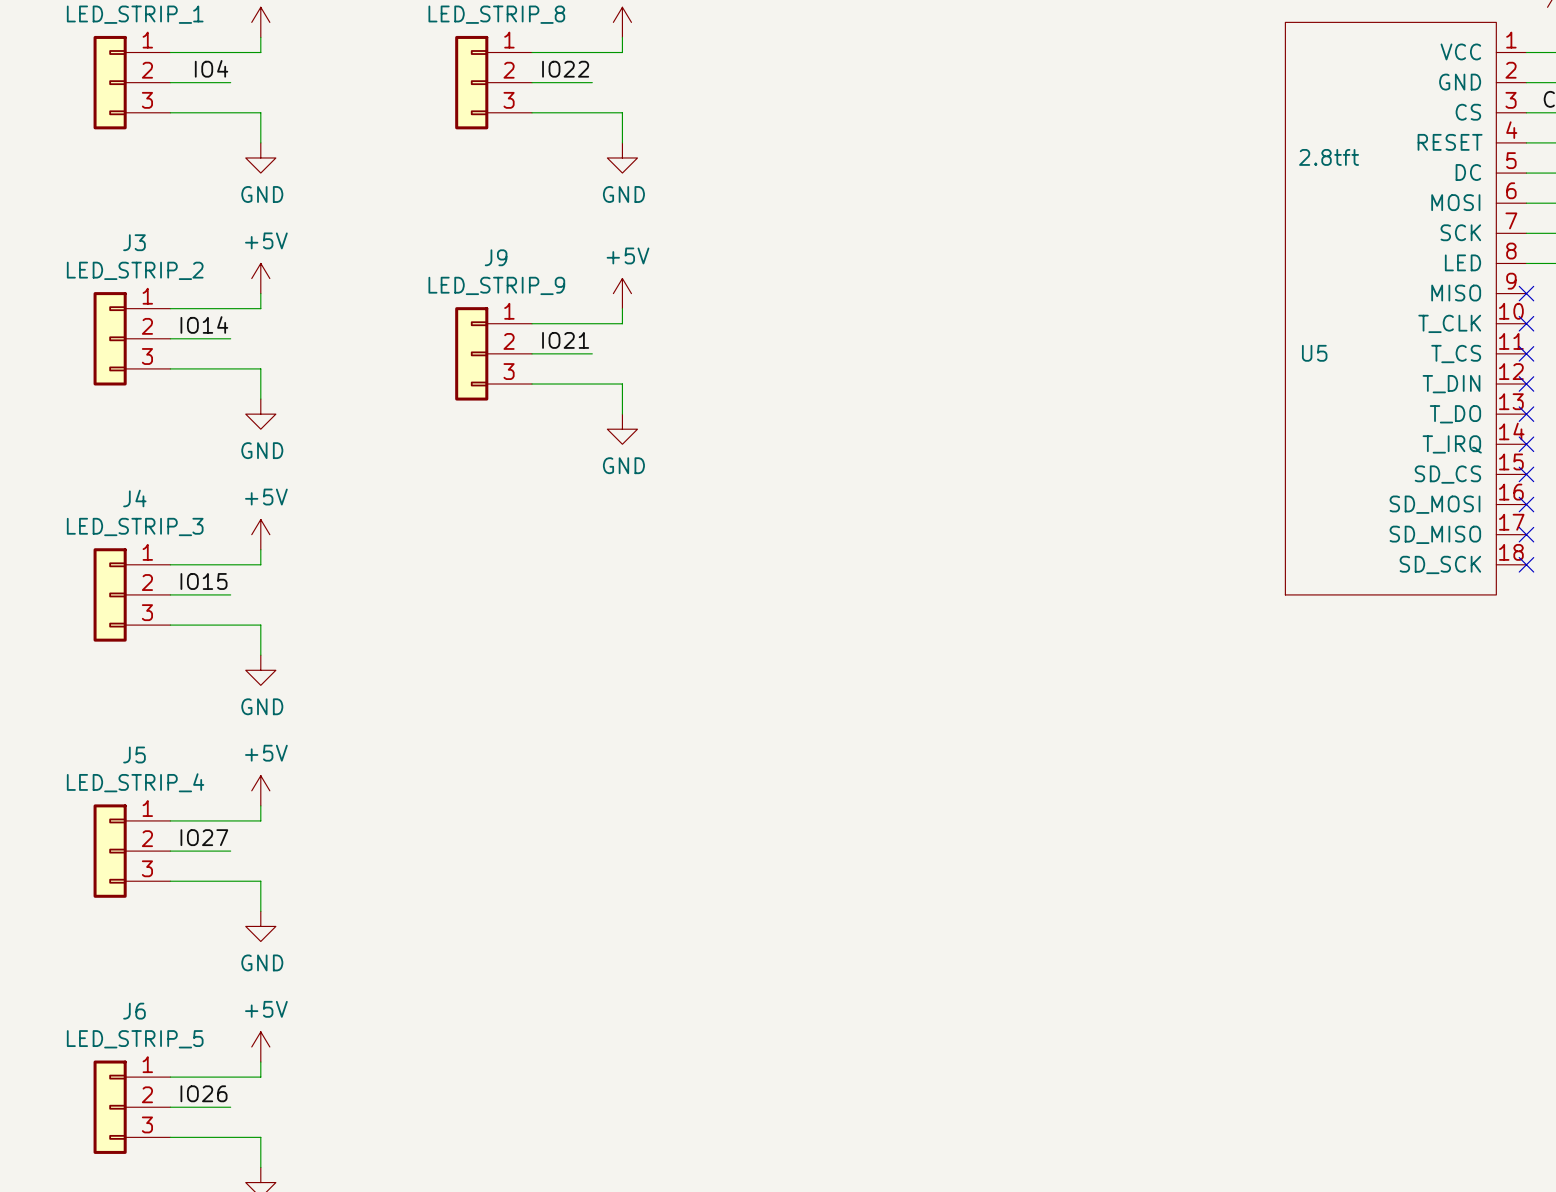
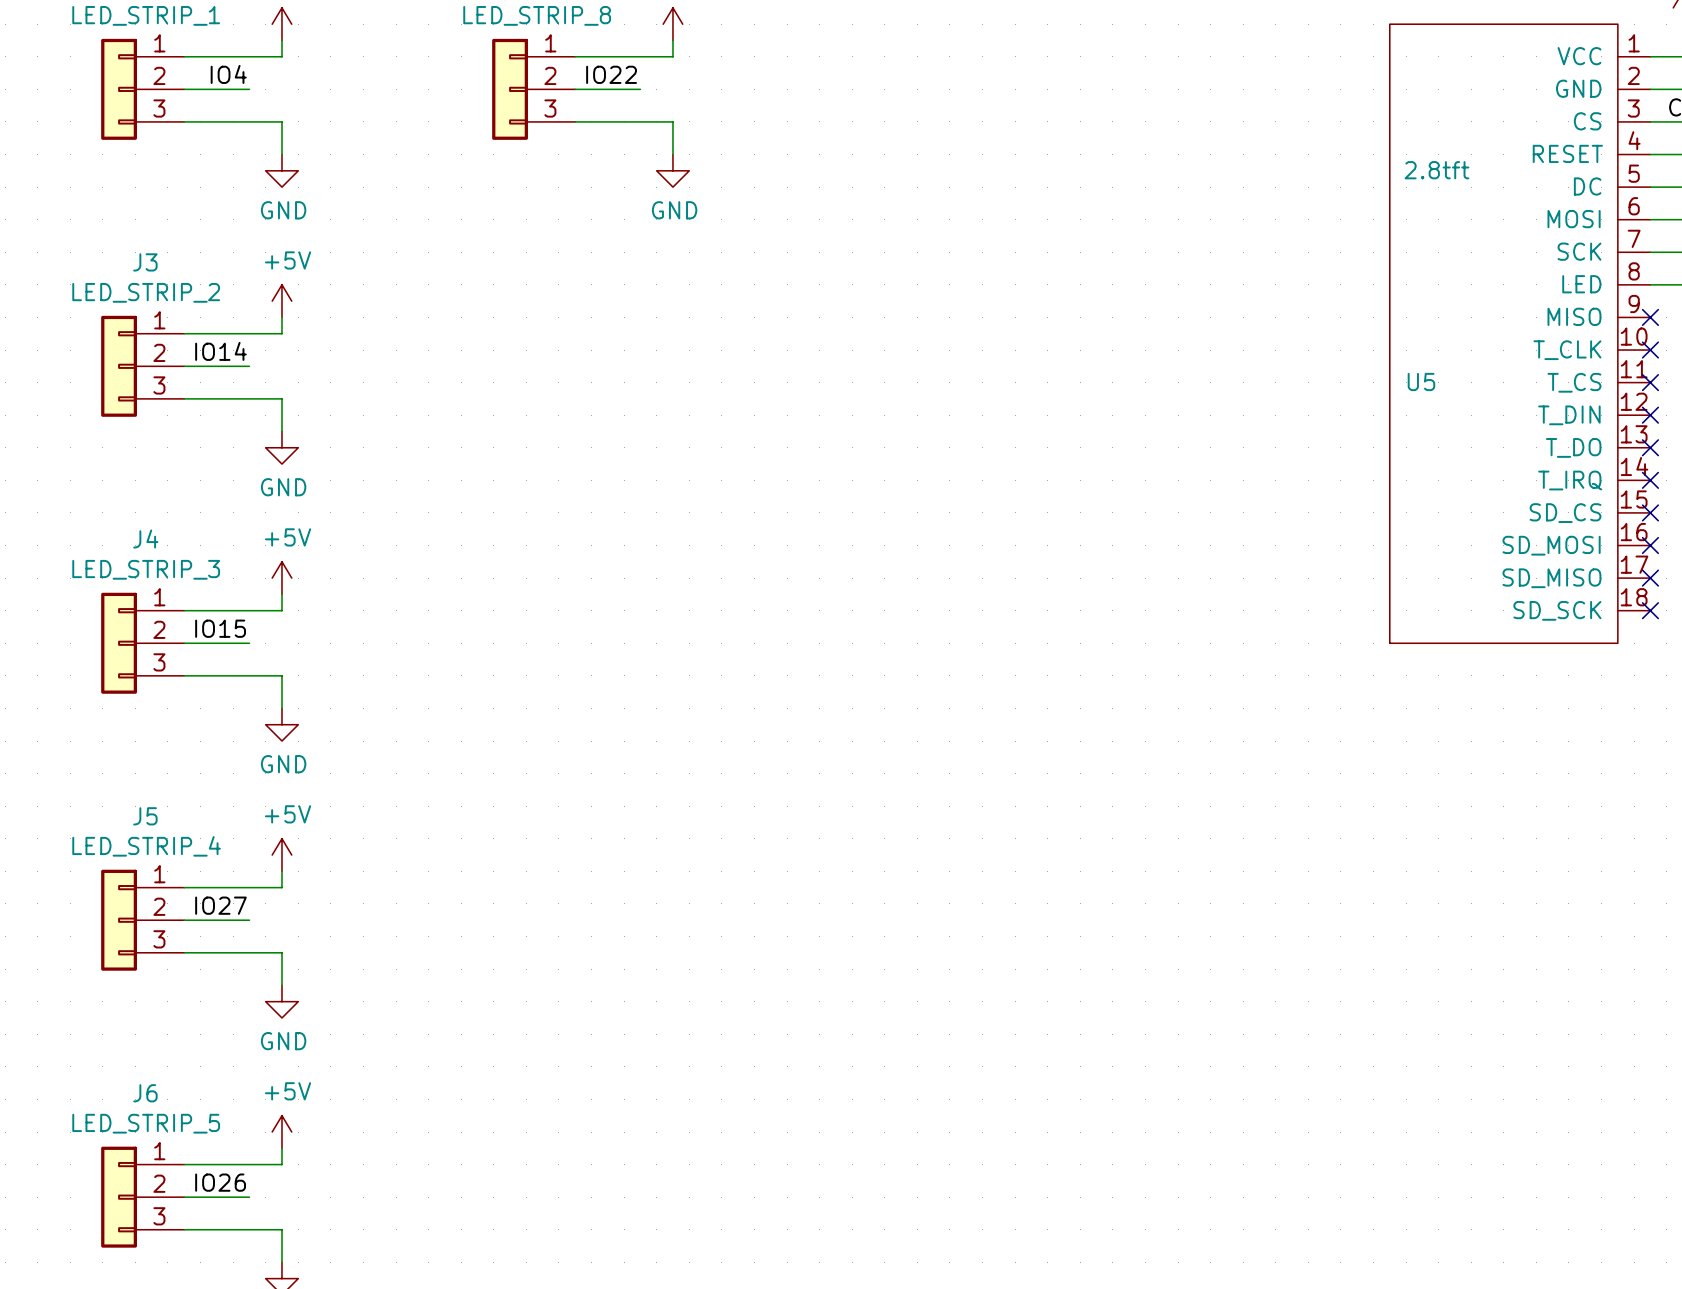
power symbol: +5V (622, 293) -> none
wire: (622, 308) (622, 323) (532, 323) -> none
label: IO21 (565, 340) -> none
J9: LED_STRIP_9 (493, 353) -> none
wire: (532, 353) (592, 353) -> none
wire: (532, 384) (622, 384) (622, 414) -> none
power symbol: GND (622, 429) -> none

